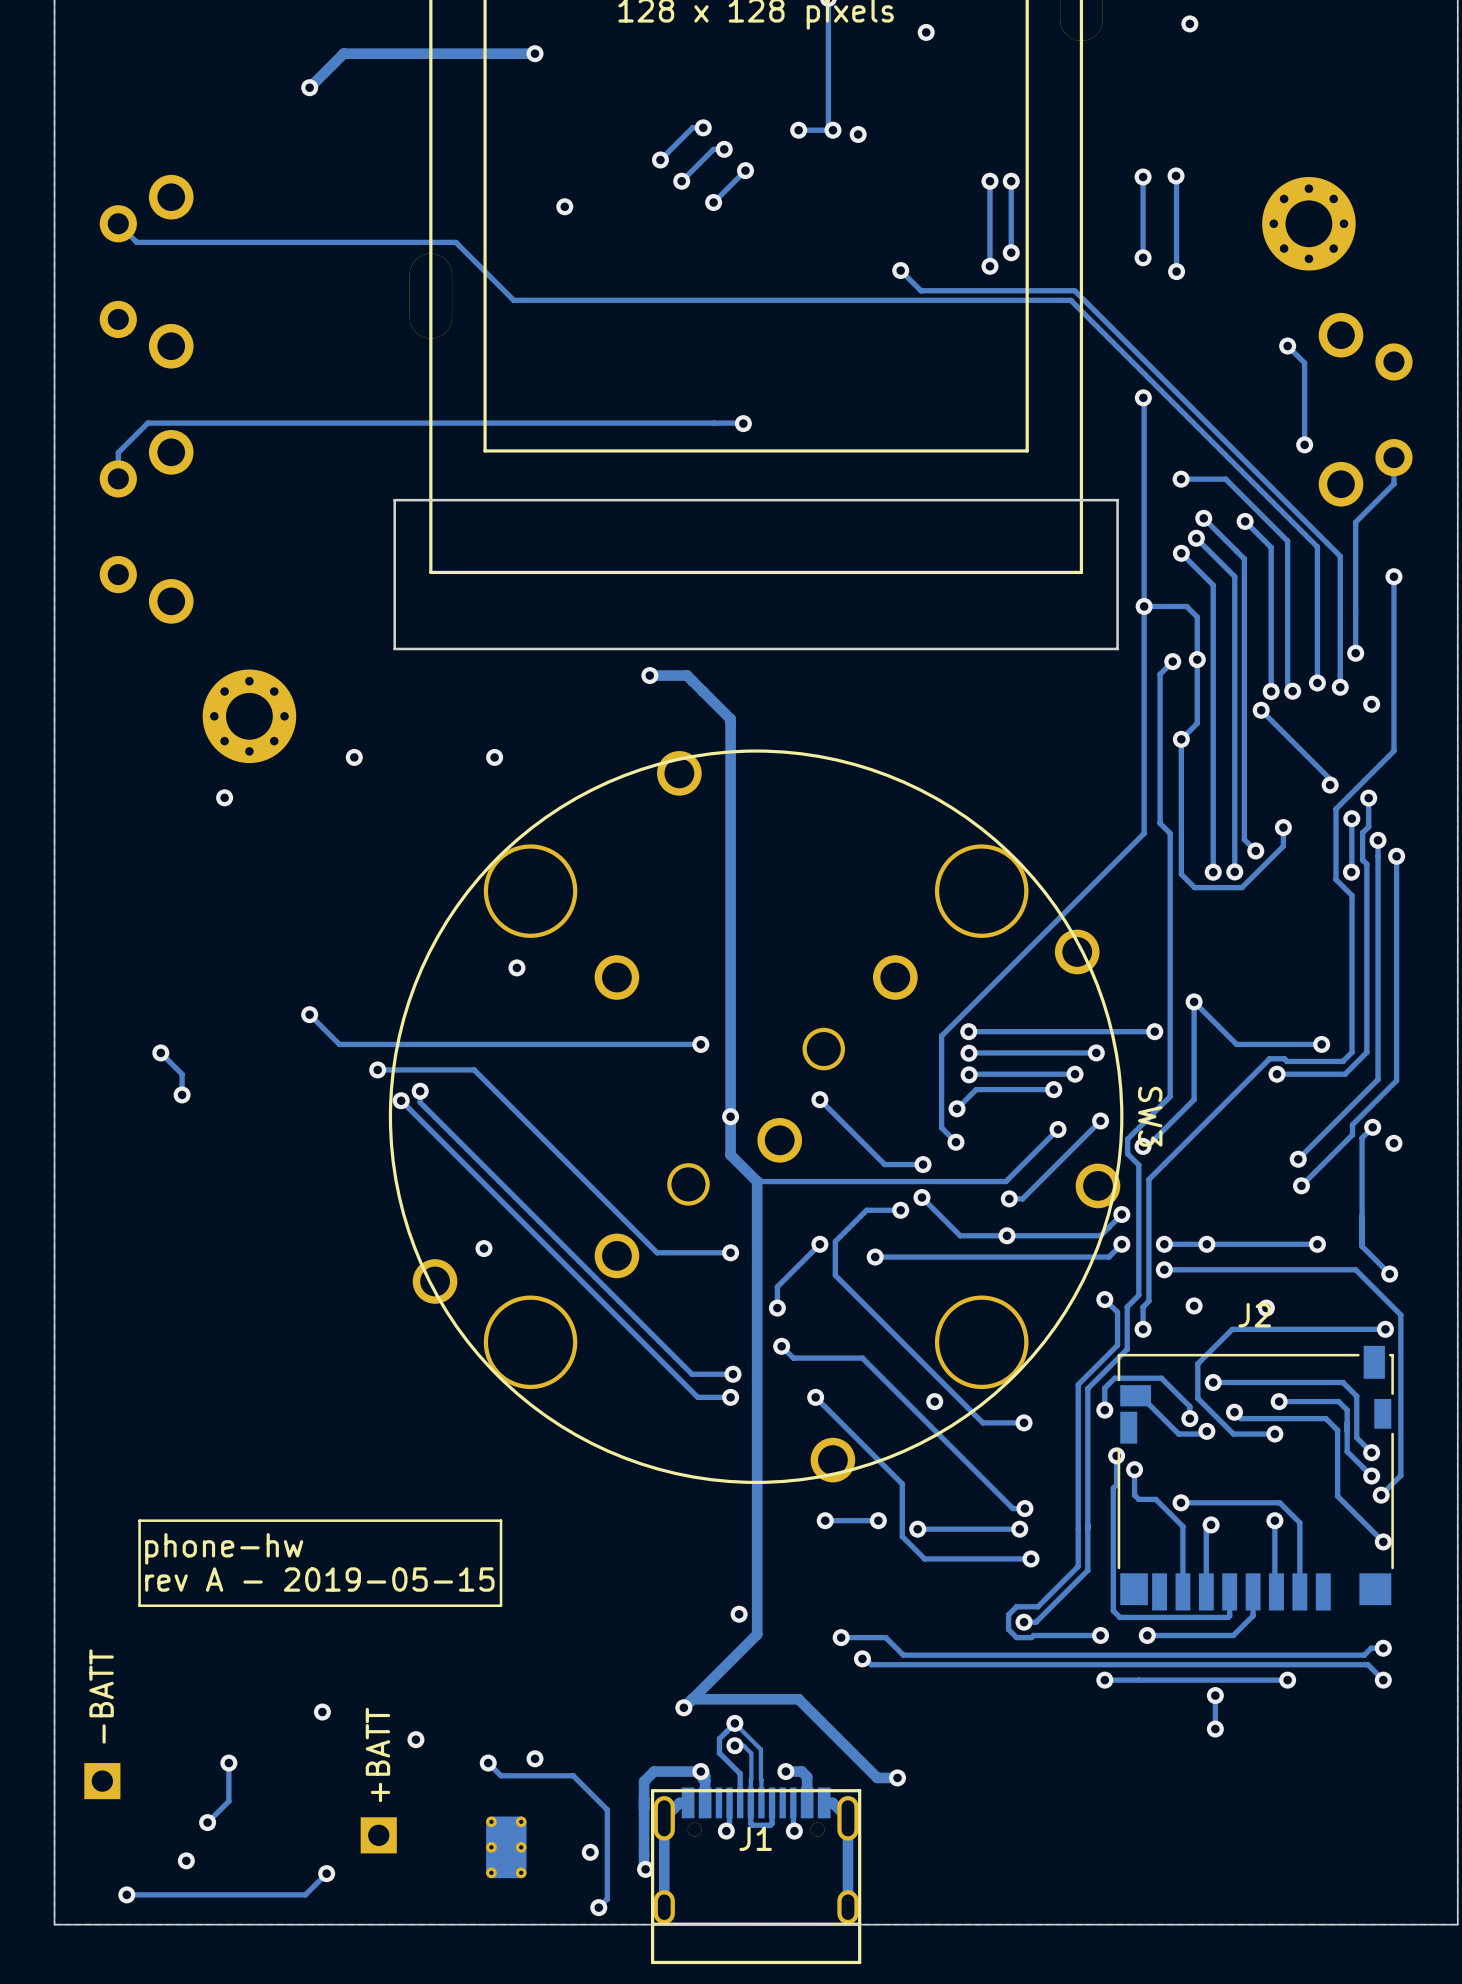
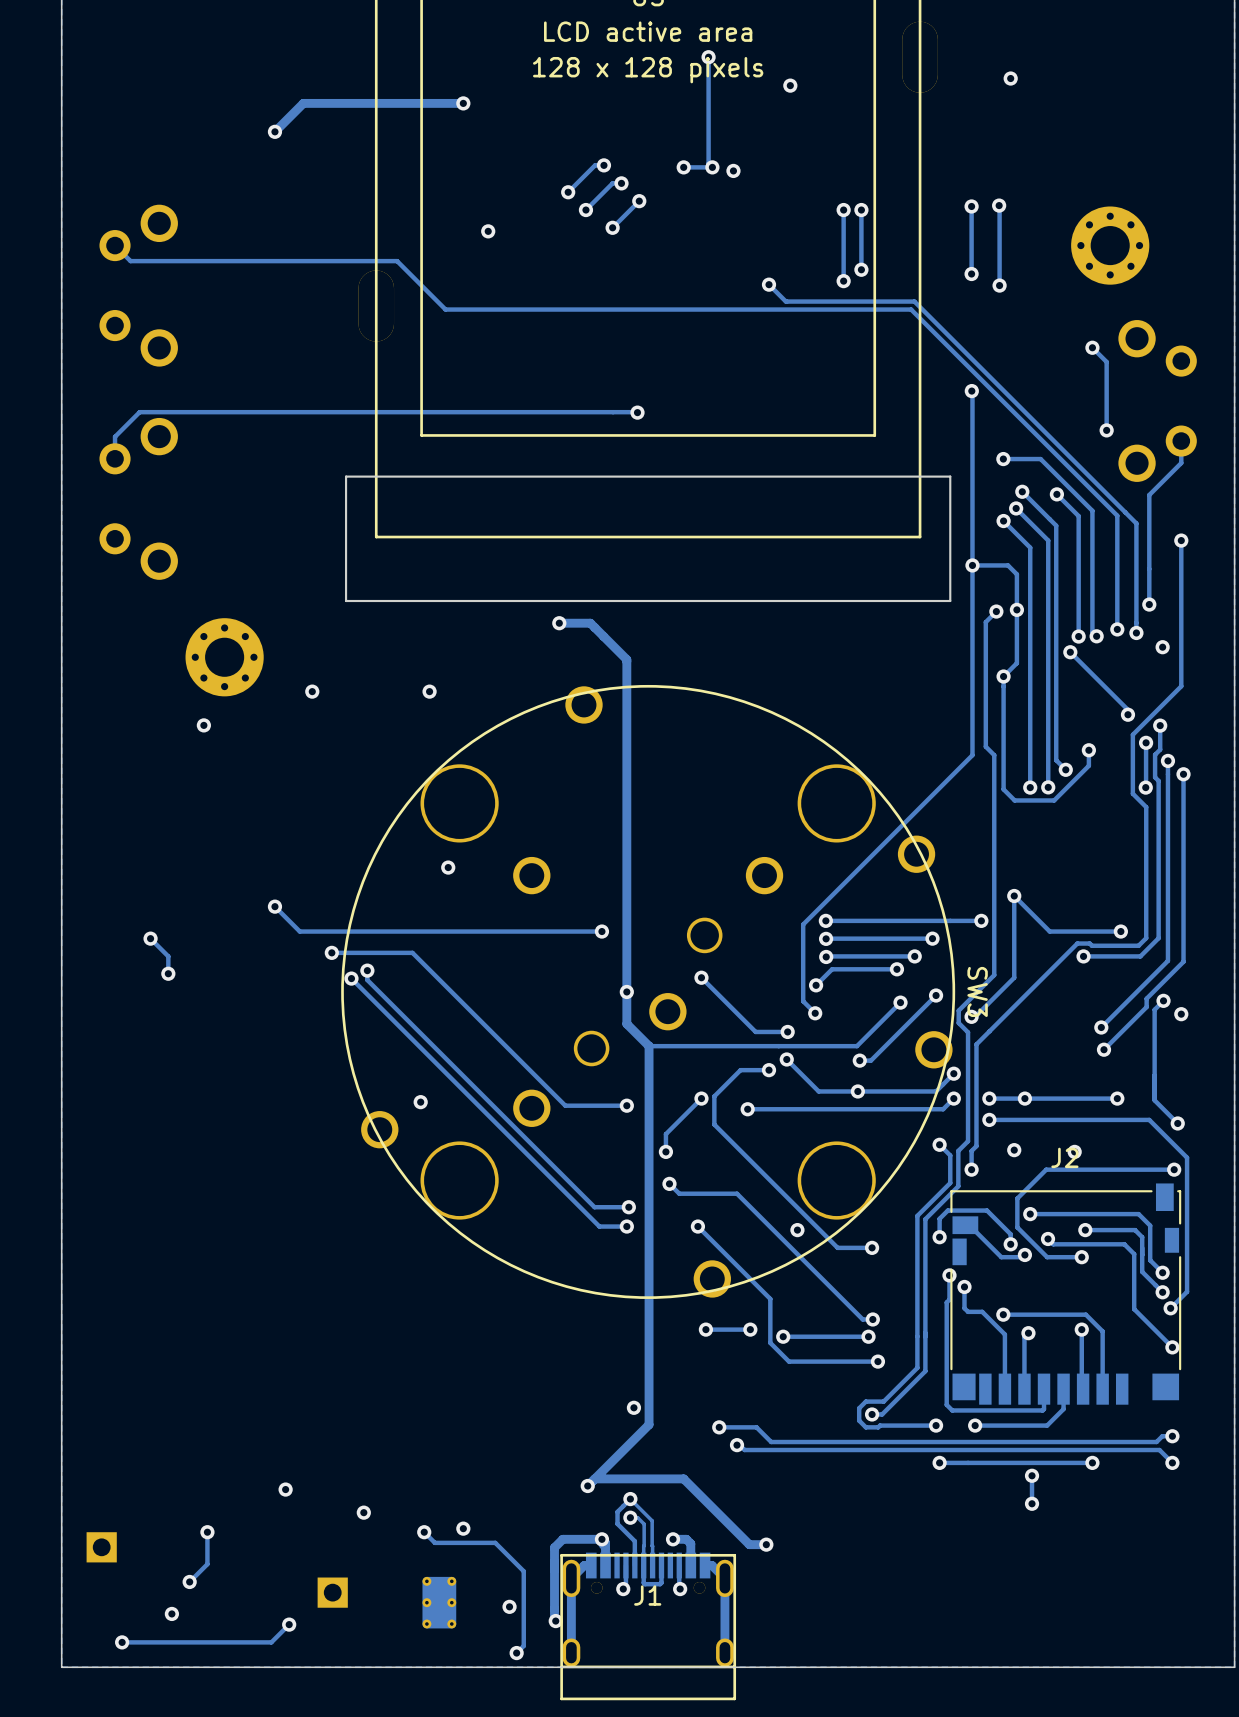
line: (501, 1520) (139, 1520) (139, 1605) (501, 1605) (501, 1520) -> none
text: phone-hw (224, 1548) -> none
text: rev A - 2019-05-15 (319, 1579) -> none
text: -BATT (101, 1696) -> none
text: +BATT (377, 1754) -> none

